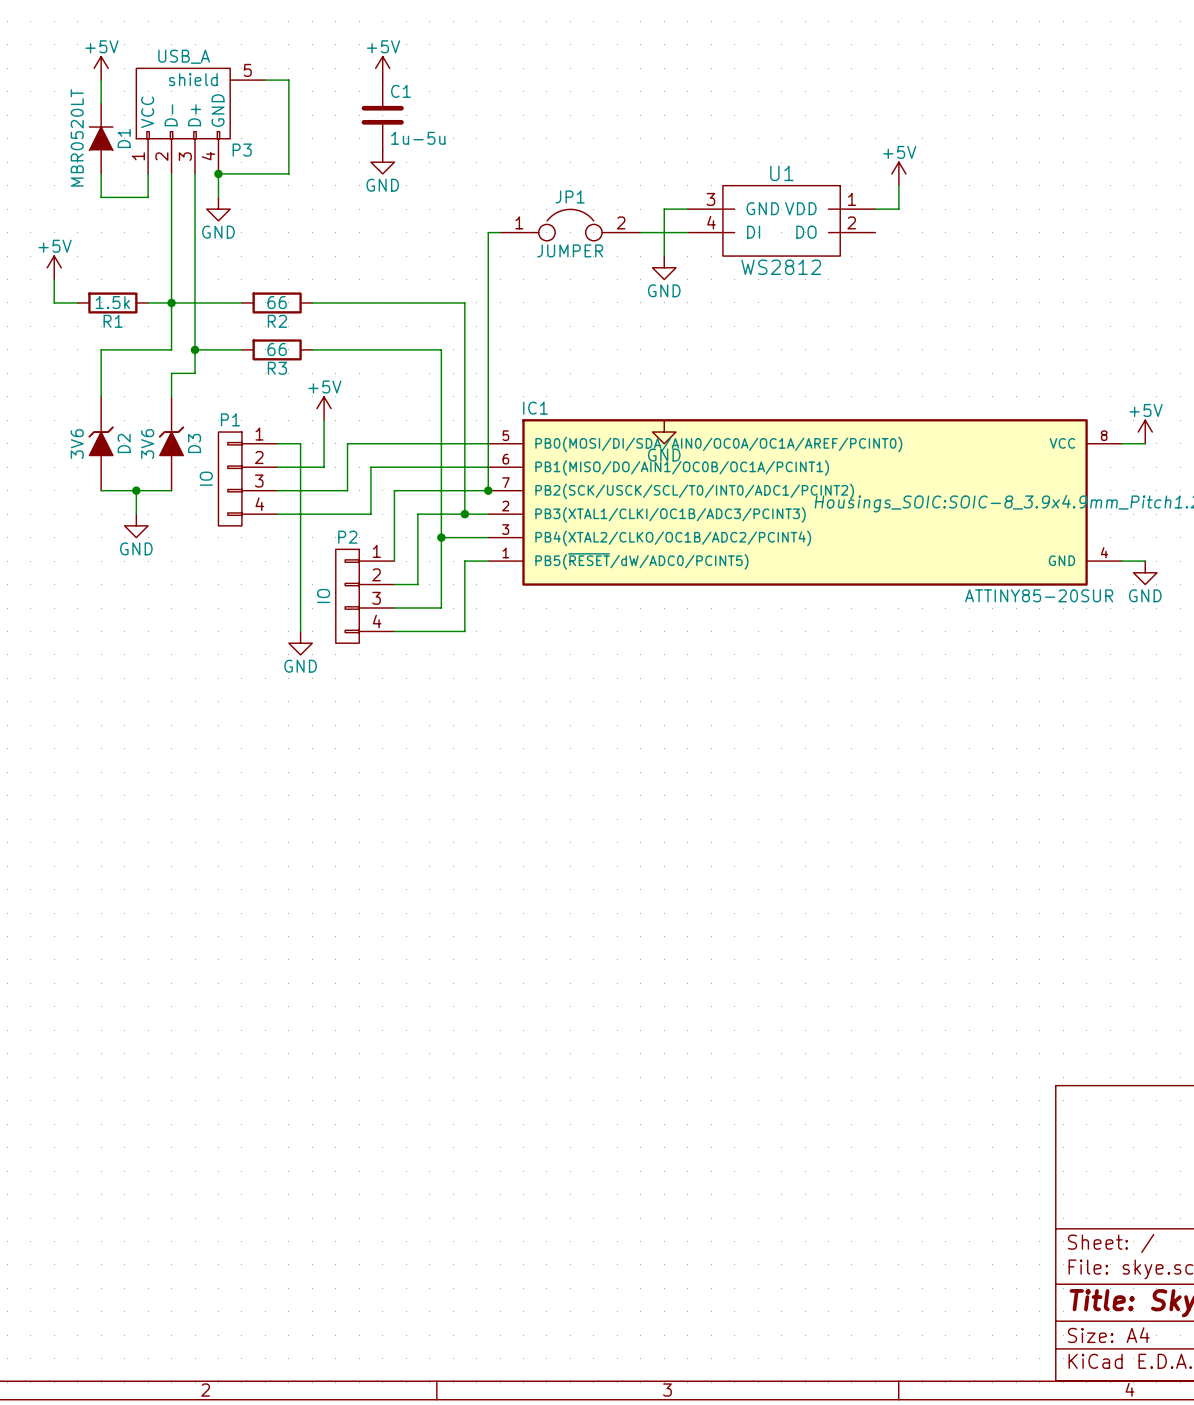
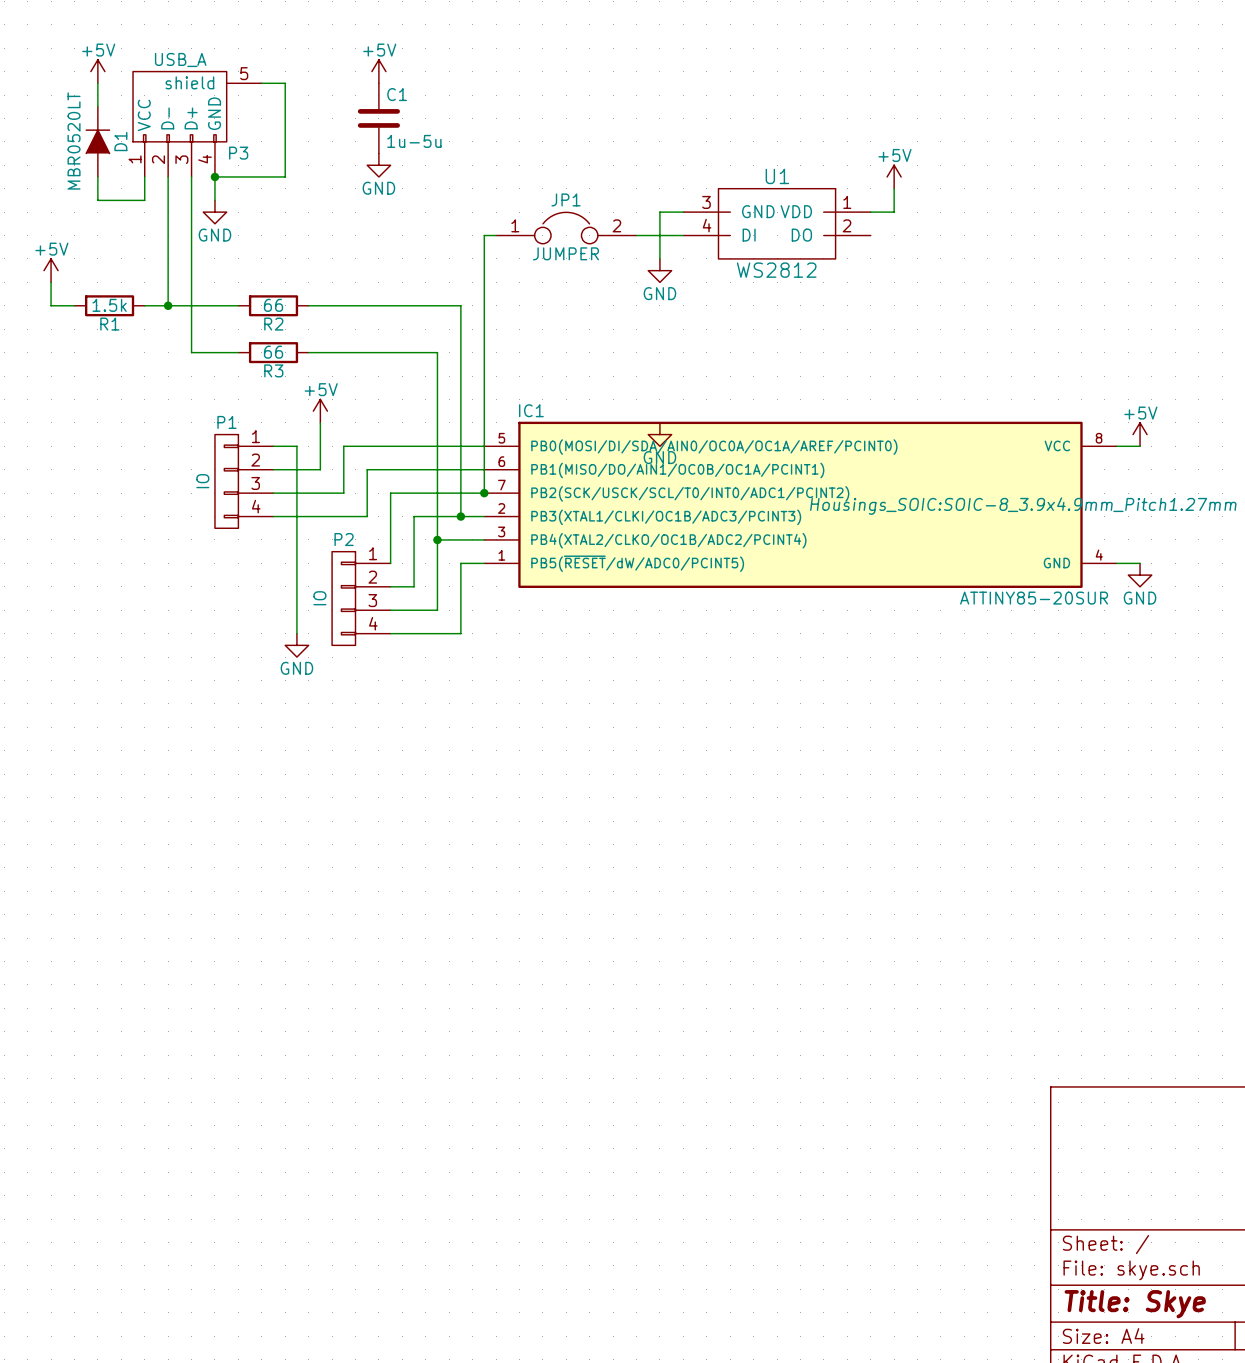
wire: (171, 302) (171, 349) (101, 349) (101, 396) -> none
wire: (195, 349) (195, 373) (171, 373) (171, 396) -> none
junction: (195, 349) -> none
D2: 3V6 (101, 443) -> none
D3: 3V6 (171, 443) -> none
wire: (101, 490) (171, 490) -> none
wire: (136, 490) (136, 514) -> none
junction: (136, 490) -> none
power symbol: GND (136, 525) -> none

